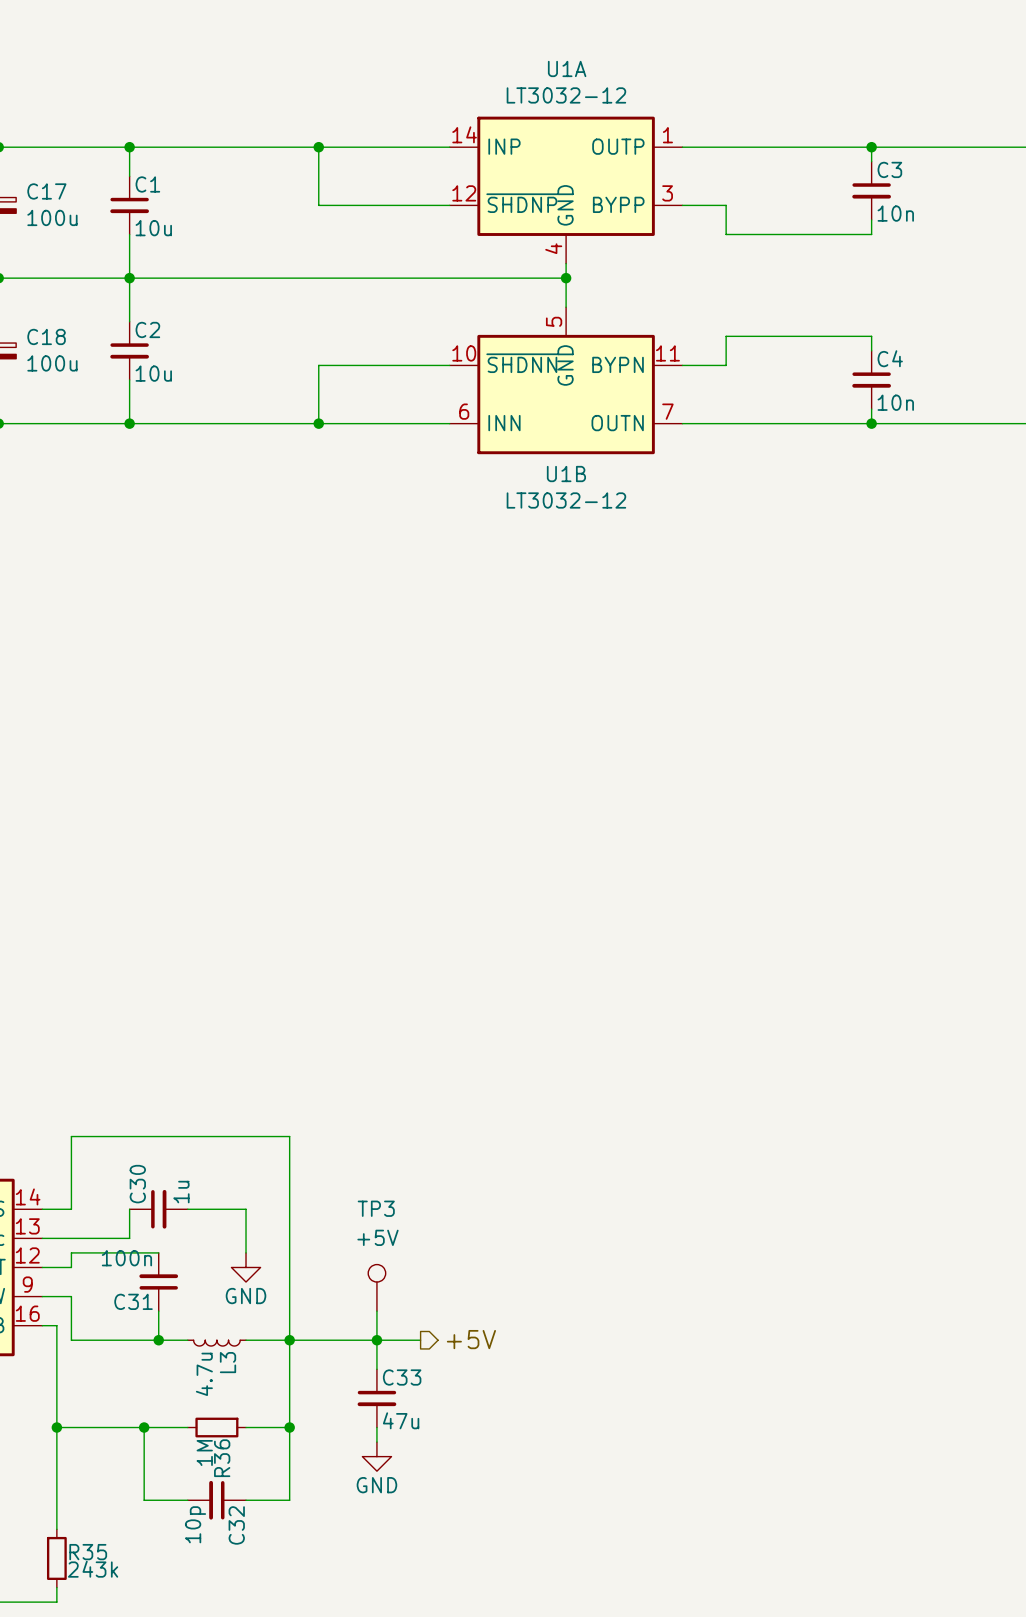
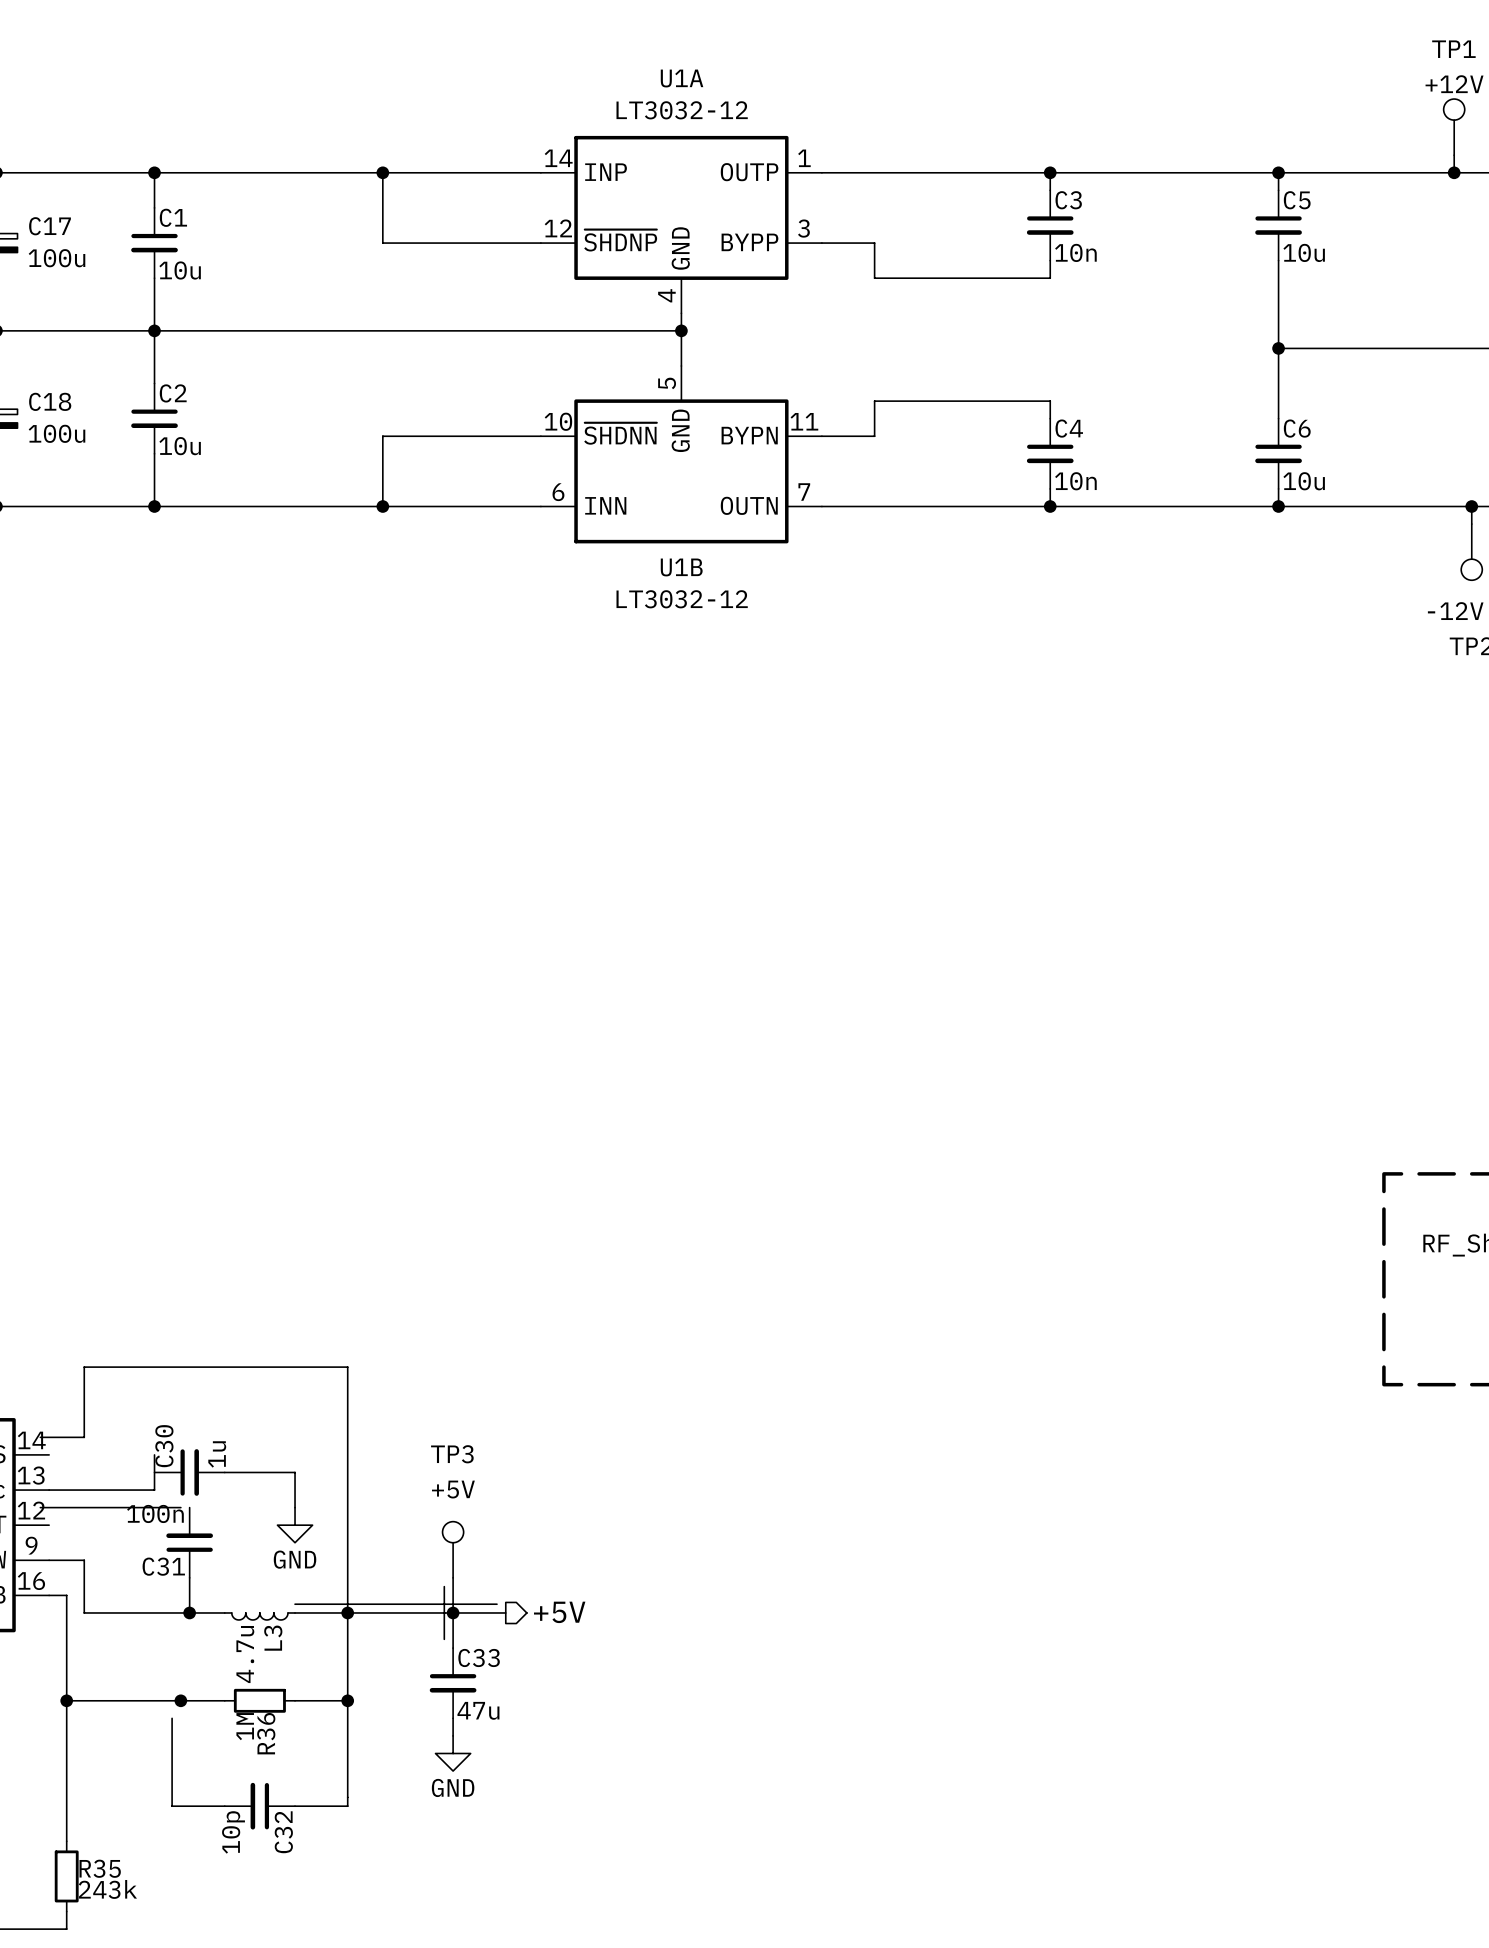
wire: (71, 1194) (71, 1209) (42, 1209) -> (84, 1437) (40, 1437)
C30 position: (158, 1209) -> (189, 1472)
wire: (187, 1209) (246, 1209) (246, 1223) -> (224, 1472) (295, 1472)
wire: (71, 1252) (71, 1267) (42, 1267) -> (84, 1507) (40, 1507)
wire: (151, 1252) (158, 1252) -> none
wire: none -> (444, 1586) (444, 1639)
wire: none -> (295, 1604) (497, 1604)
wire: (56, 1427) (187, 1427) -> (66, 1700) (224, 1700)
junction position: (56, 1427) -> (66, 1700)
junction position: (144, 1427) -> (180, 1700)
R36 position: (216, 1427) -> (259, 1700)
wire: (246, 1427) (289, 1427) -> (295, 1700) (347, 1700)
junction position: (289, 1427) -> (347, 1700)

